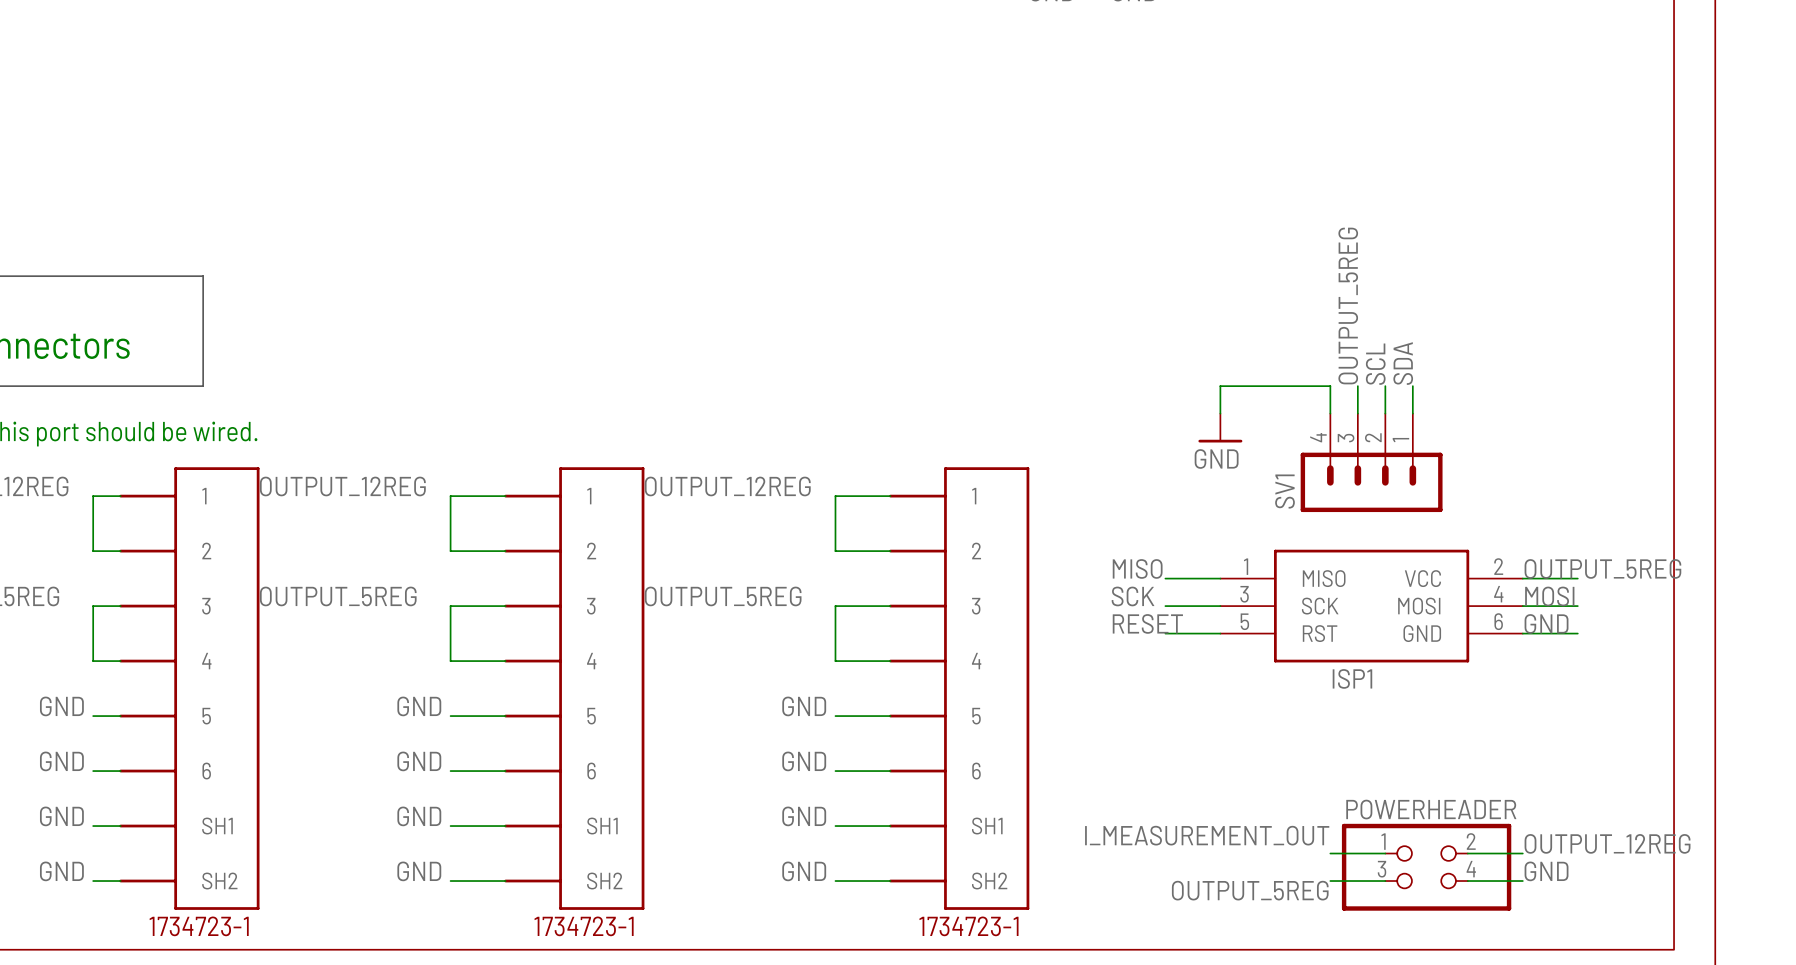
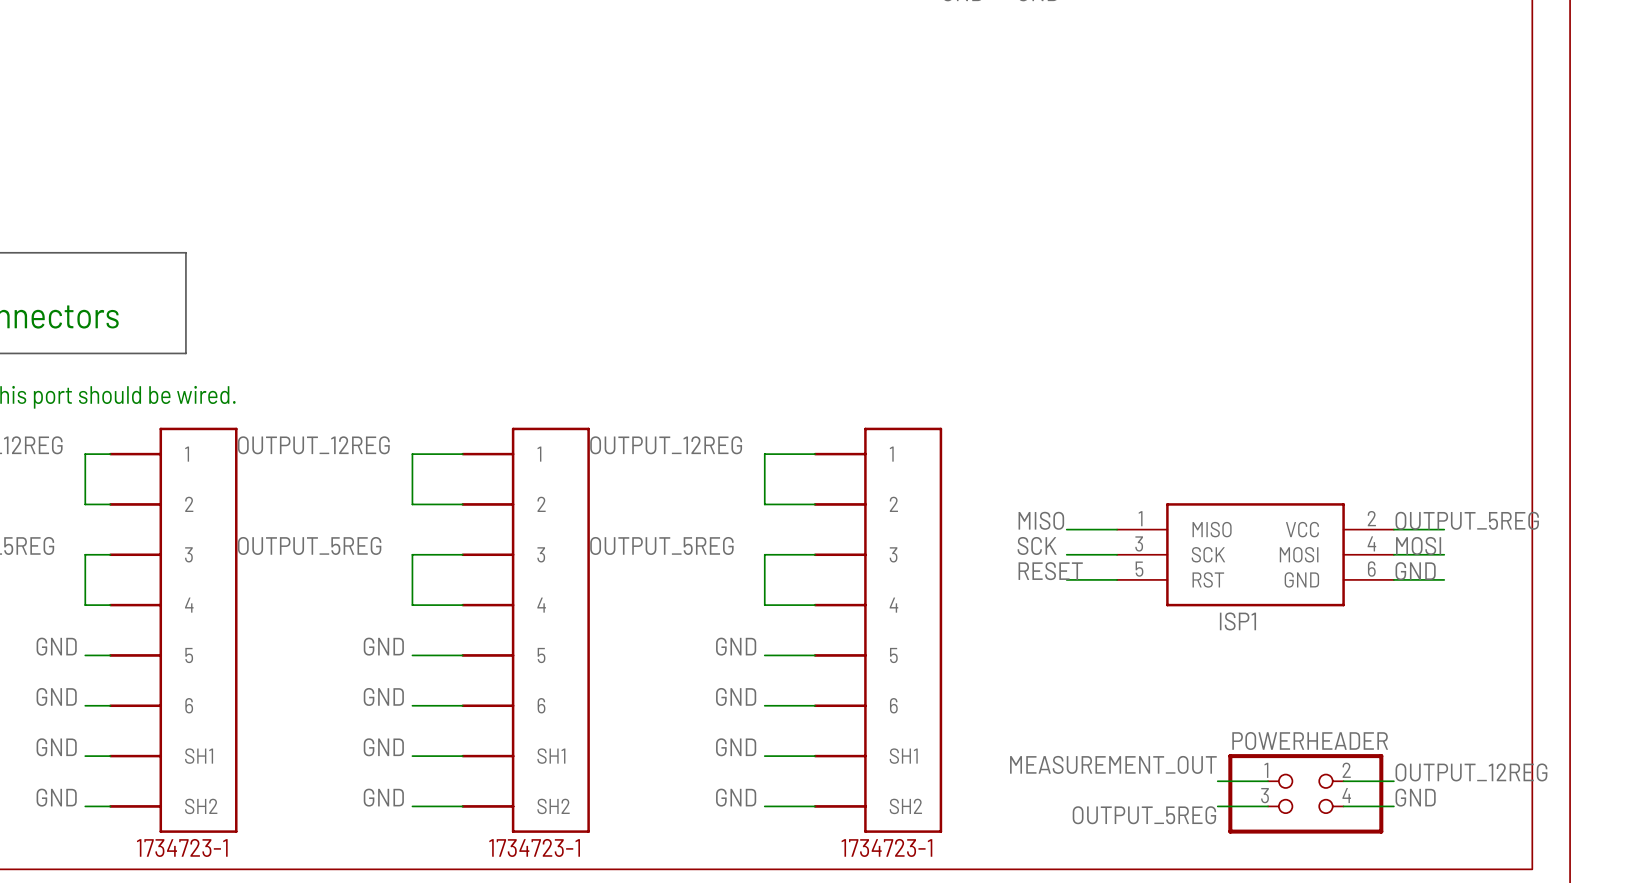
label: OUTPUT_5REG (1348, 306) -> none
label: SDA (1403, 363) -> none
label: SCL (1375, 364) -> none
wire: (1357, 386) (1357, 413) -> none
wire: (1385, 386) (1385, 413) -> none
wire: (1412, 386) (1412, 413) -> none
wire: (1220, 413) (1220, 386) (1330, 386) (1330, 413) -> none
power symbol: GND (1220, 428) -> none
SV1: (1371, 462) -> none
label: I_MEASUREMENT_OUT (1207, 835) -> MEASUREMENT_OUT (1113, 764)

